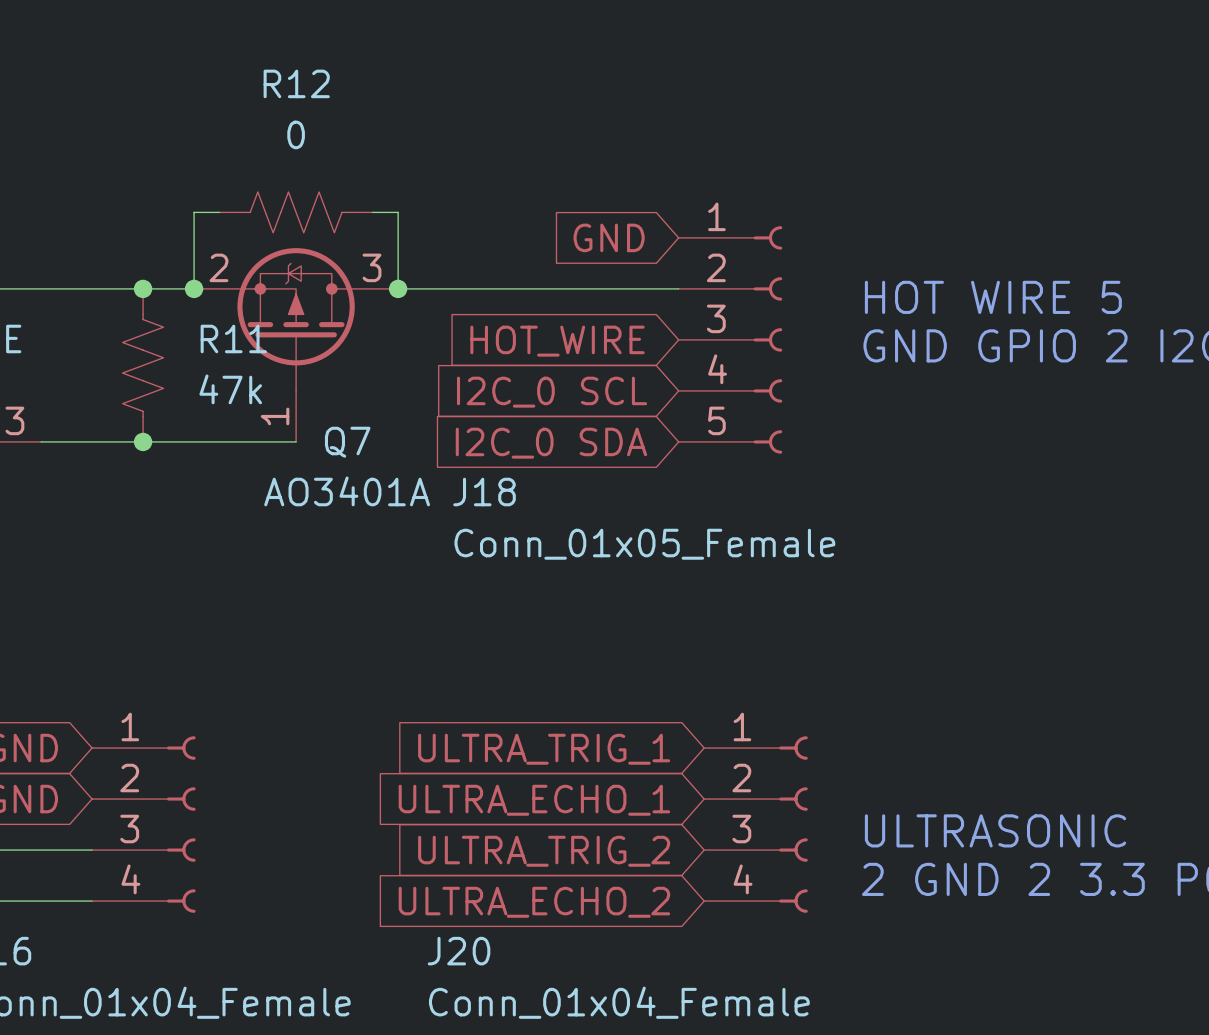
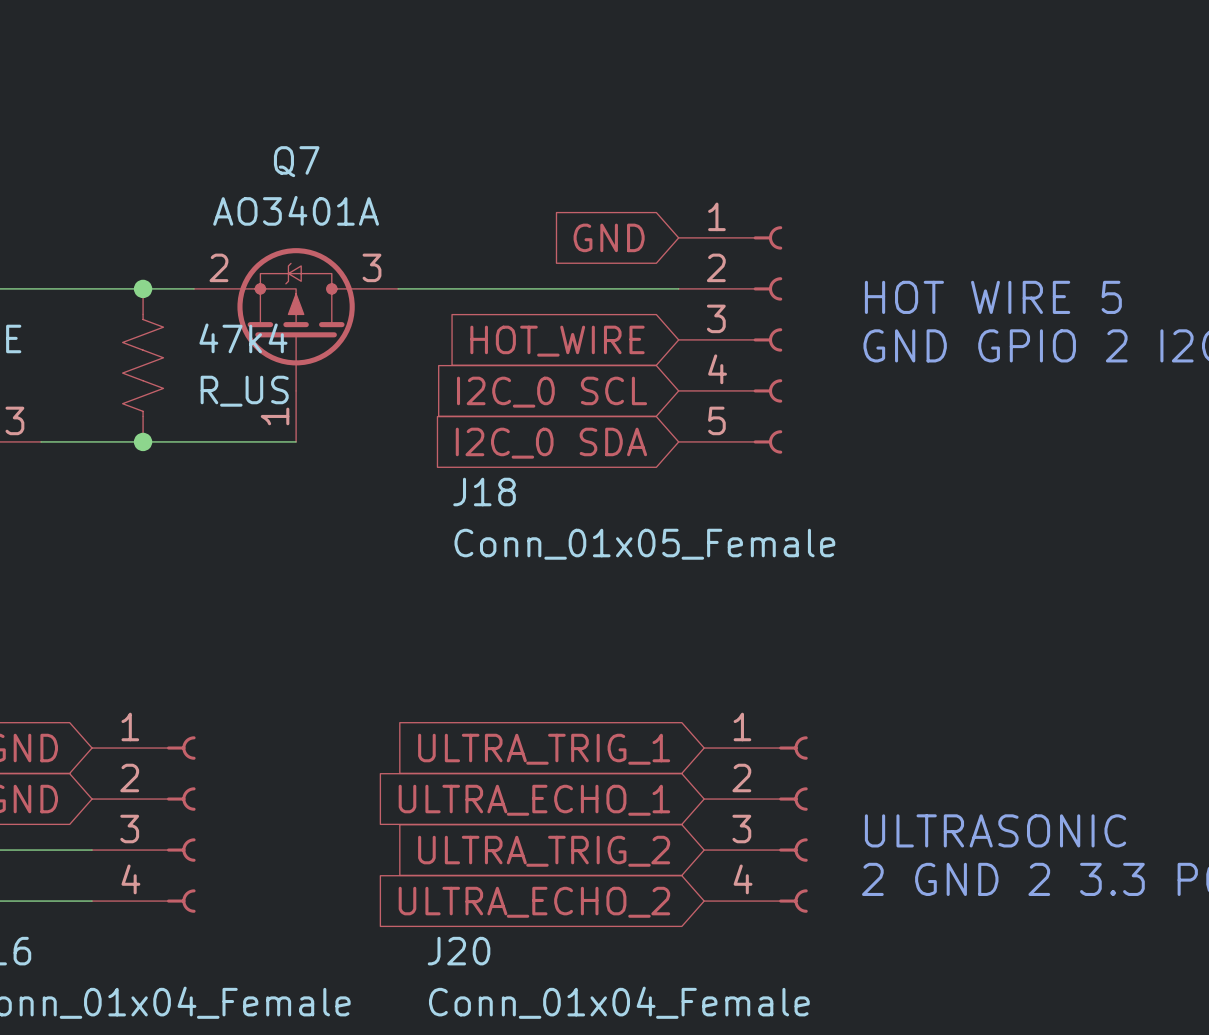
wire: (219, 212) (194, 212) (194, 288) -> none
R12: 0 (296, 212) -> none
wire: (372, 212) (398, 212) (398, 288) -> none
junction: (194, 288) -> none
junction: (398, 288) -> none
R11 name: R11 (233, 338) -> 47k4 (243, 338)
R11 value: 47k (230, 389) -> R_US (244, 391)
Q7 name position: Q7 (347, 442) -> Q7 (296, 161)
Q7 value position: AO3401A (347, 491) -> AO3401A (296, 210)

